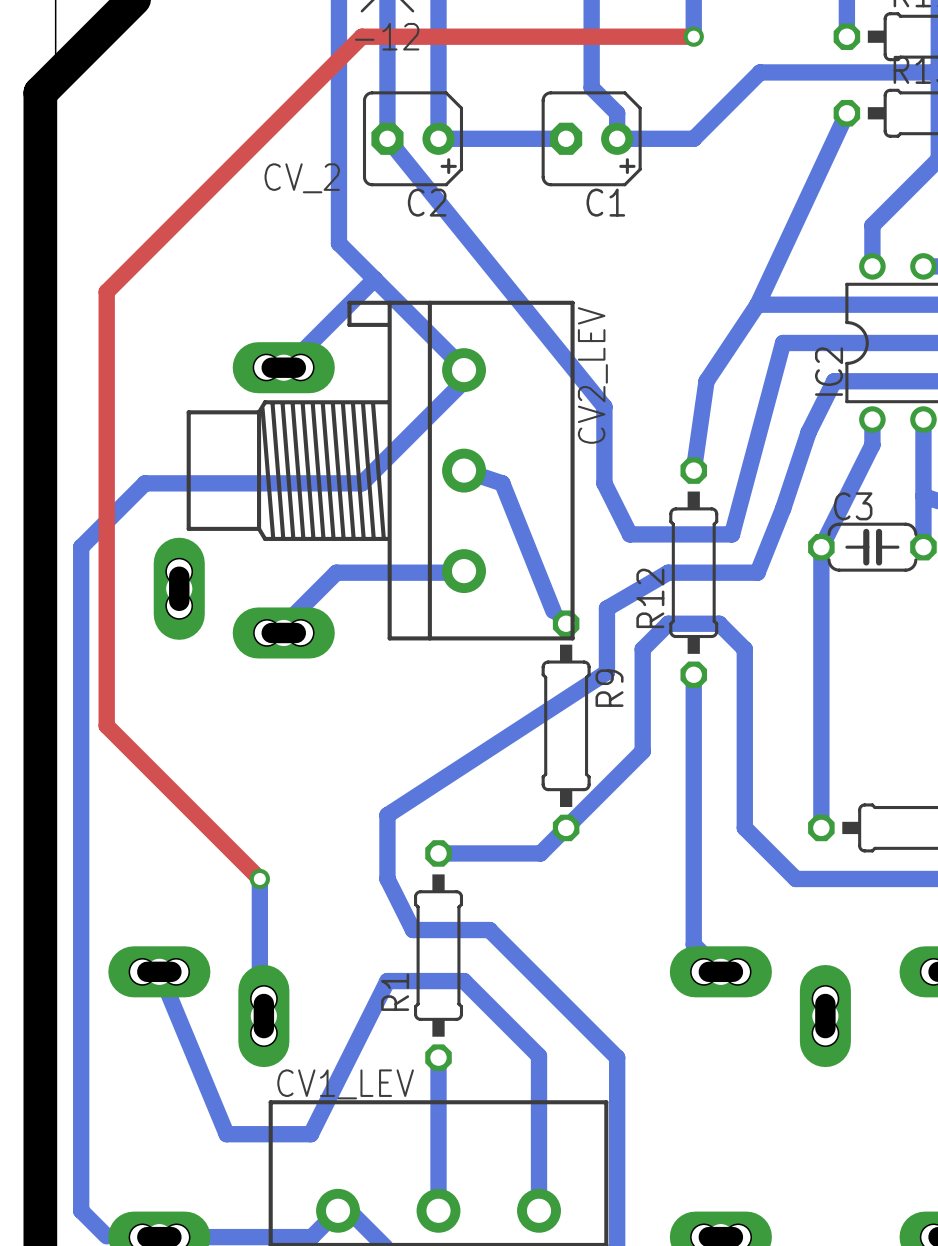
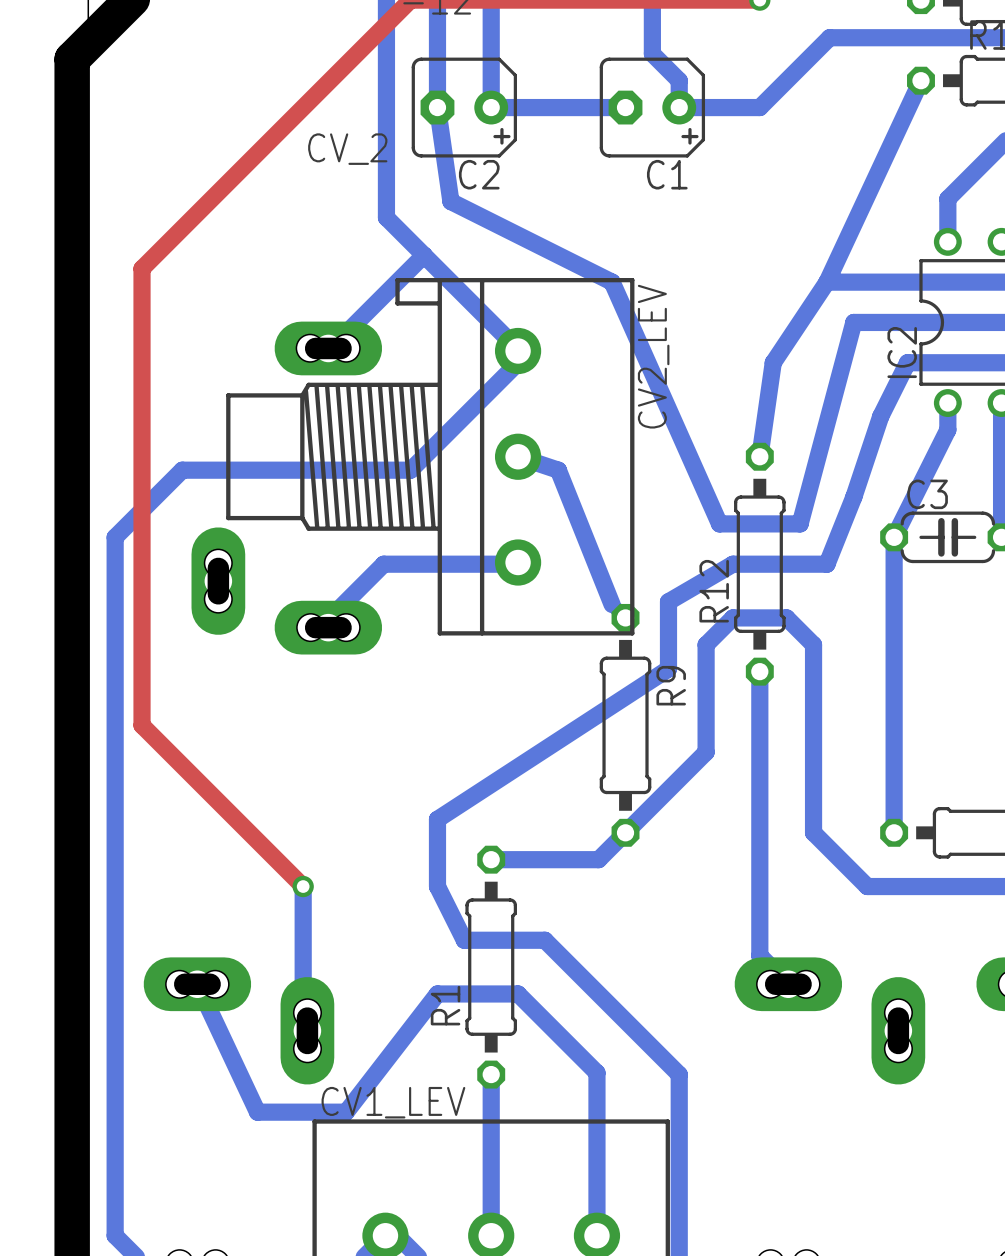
bottom track: (387, 138) (604, 406) (604, 483) (629, 534) (655, 534) -> (437, 107) (450, 201) (612, 282) (719, 523)
bottom track: (159, 971) (226, 1134) (310, 1134) (387, 981) -> (197, 984) (257, 1112) (346, 1112) (437, 993)

